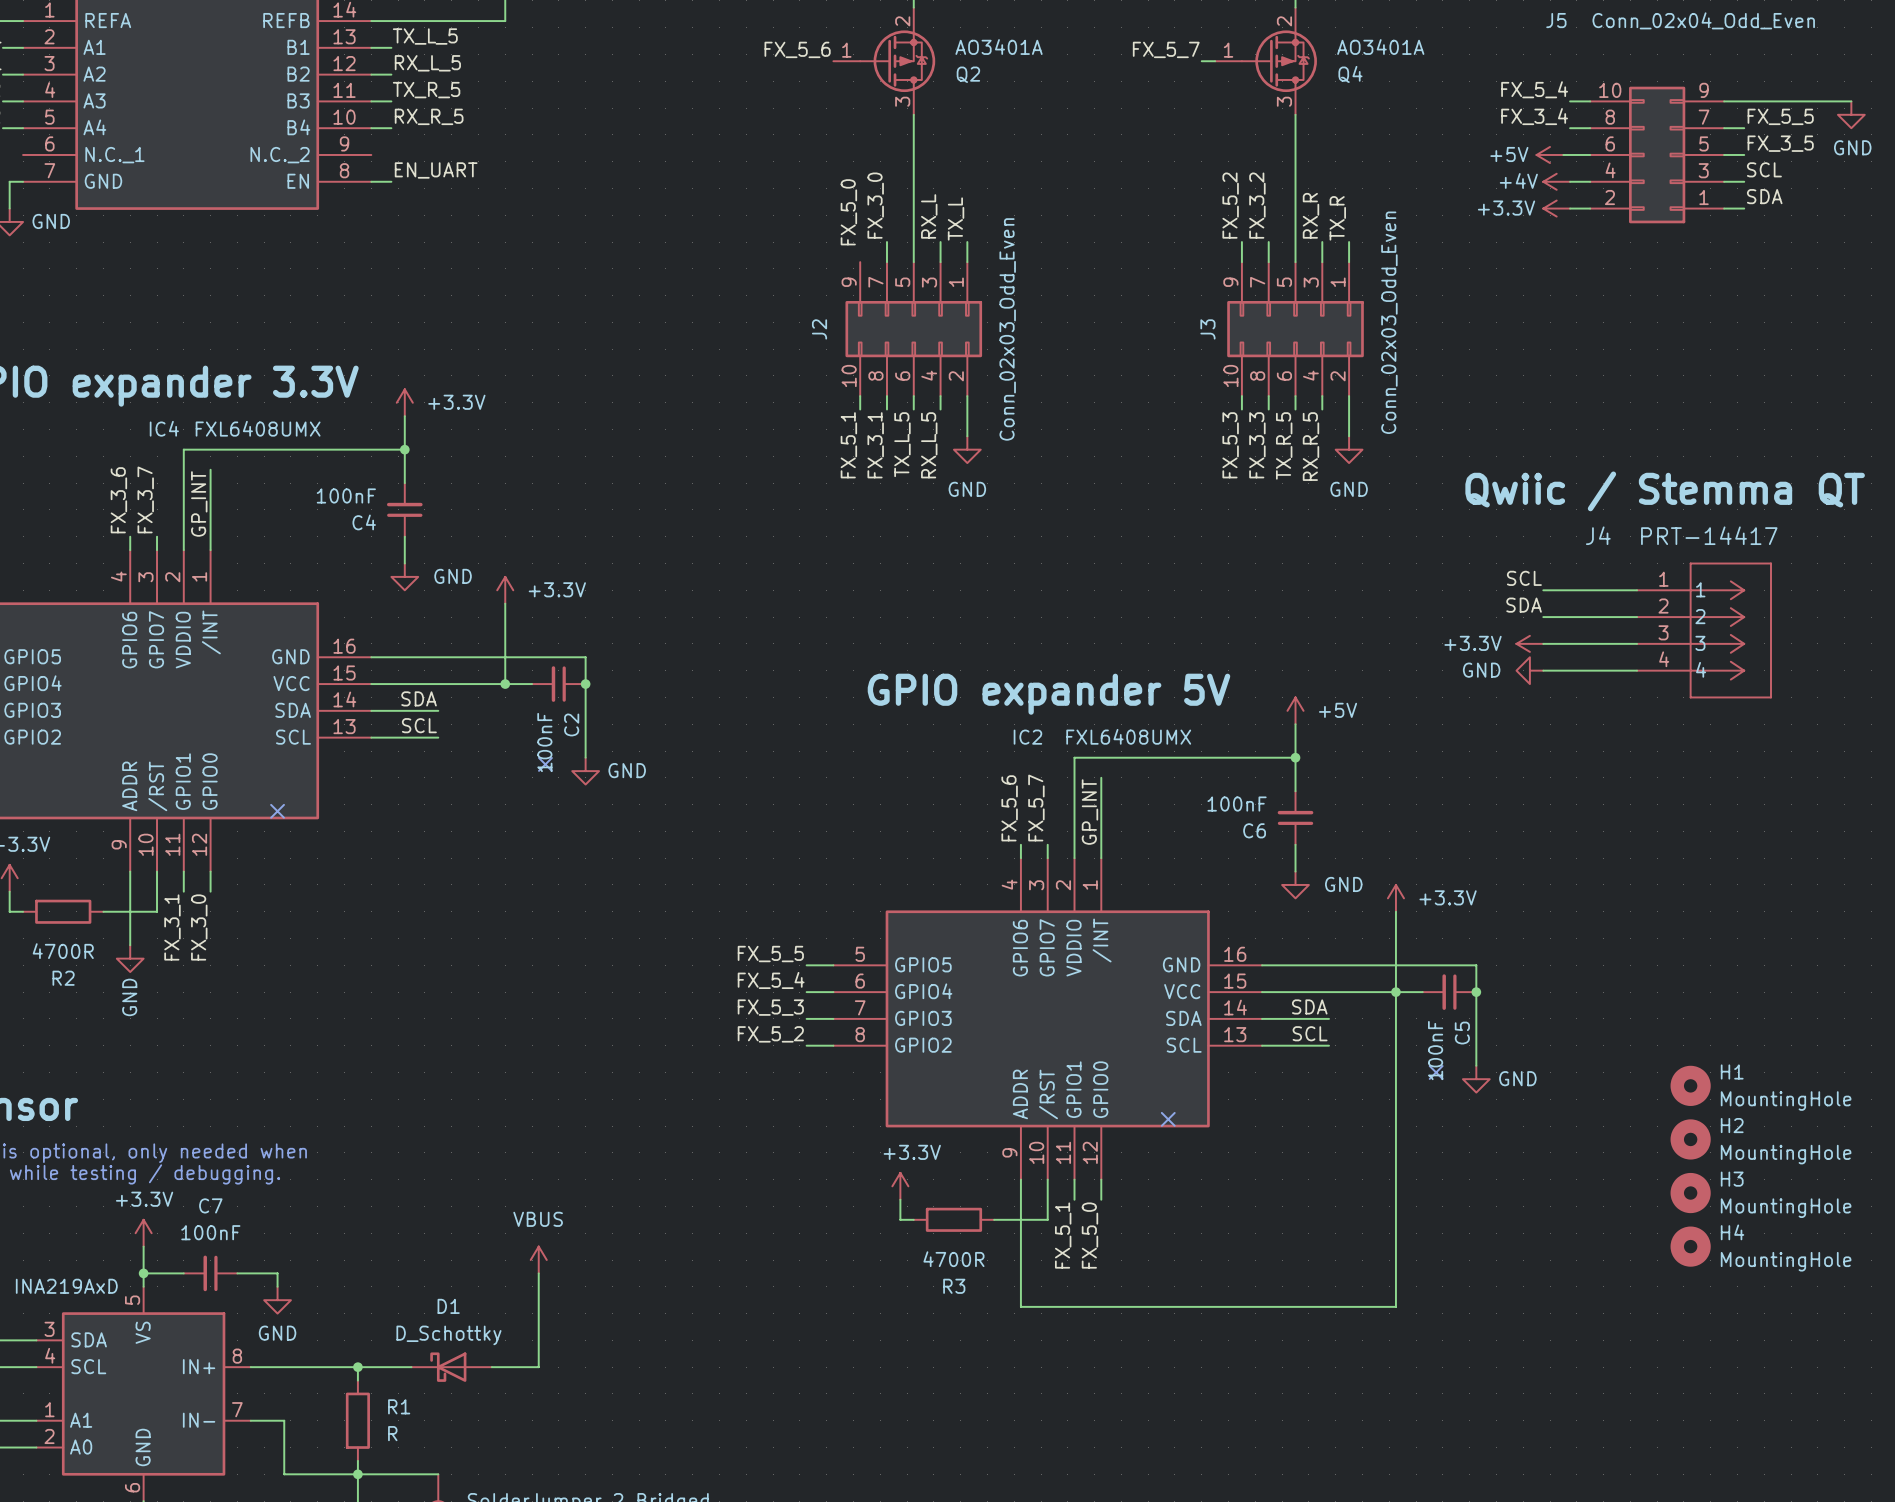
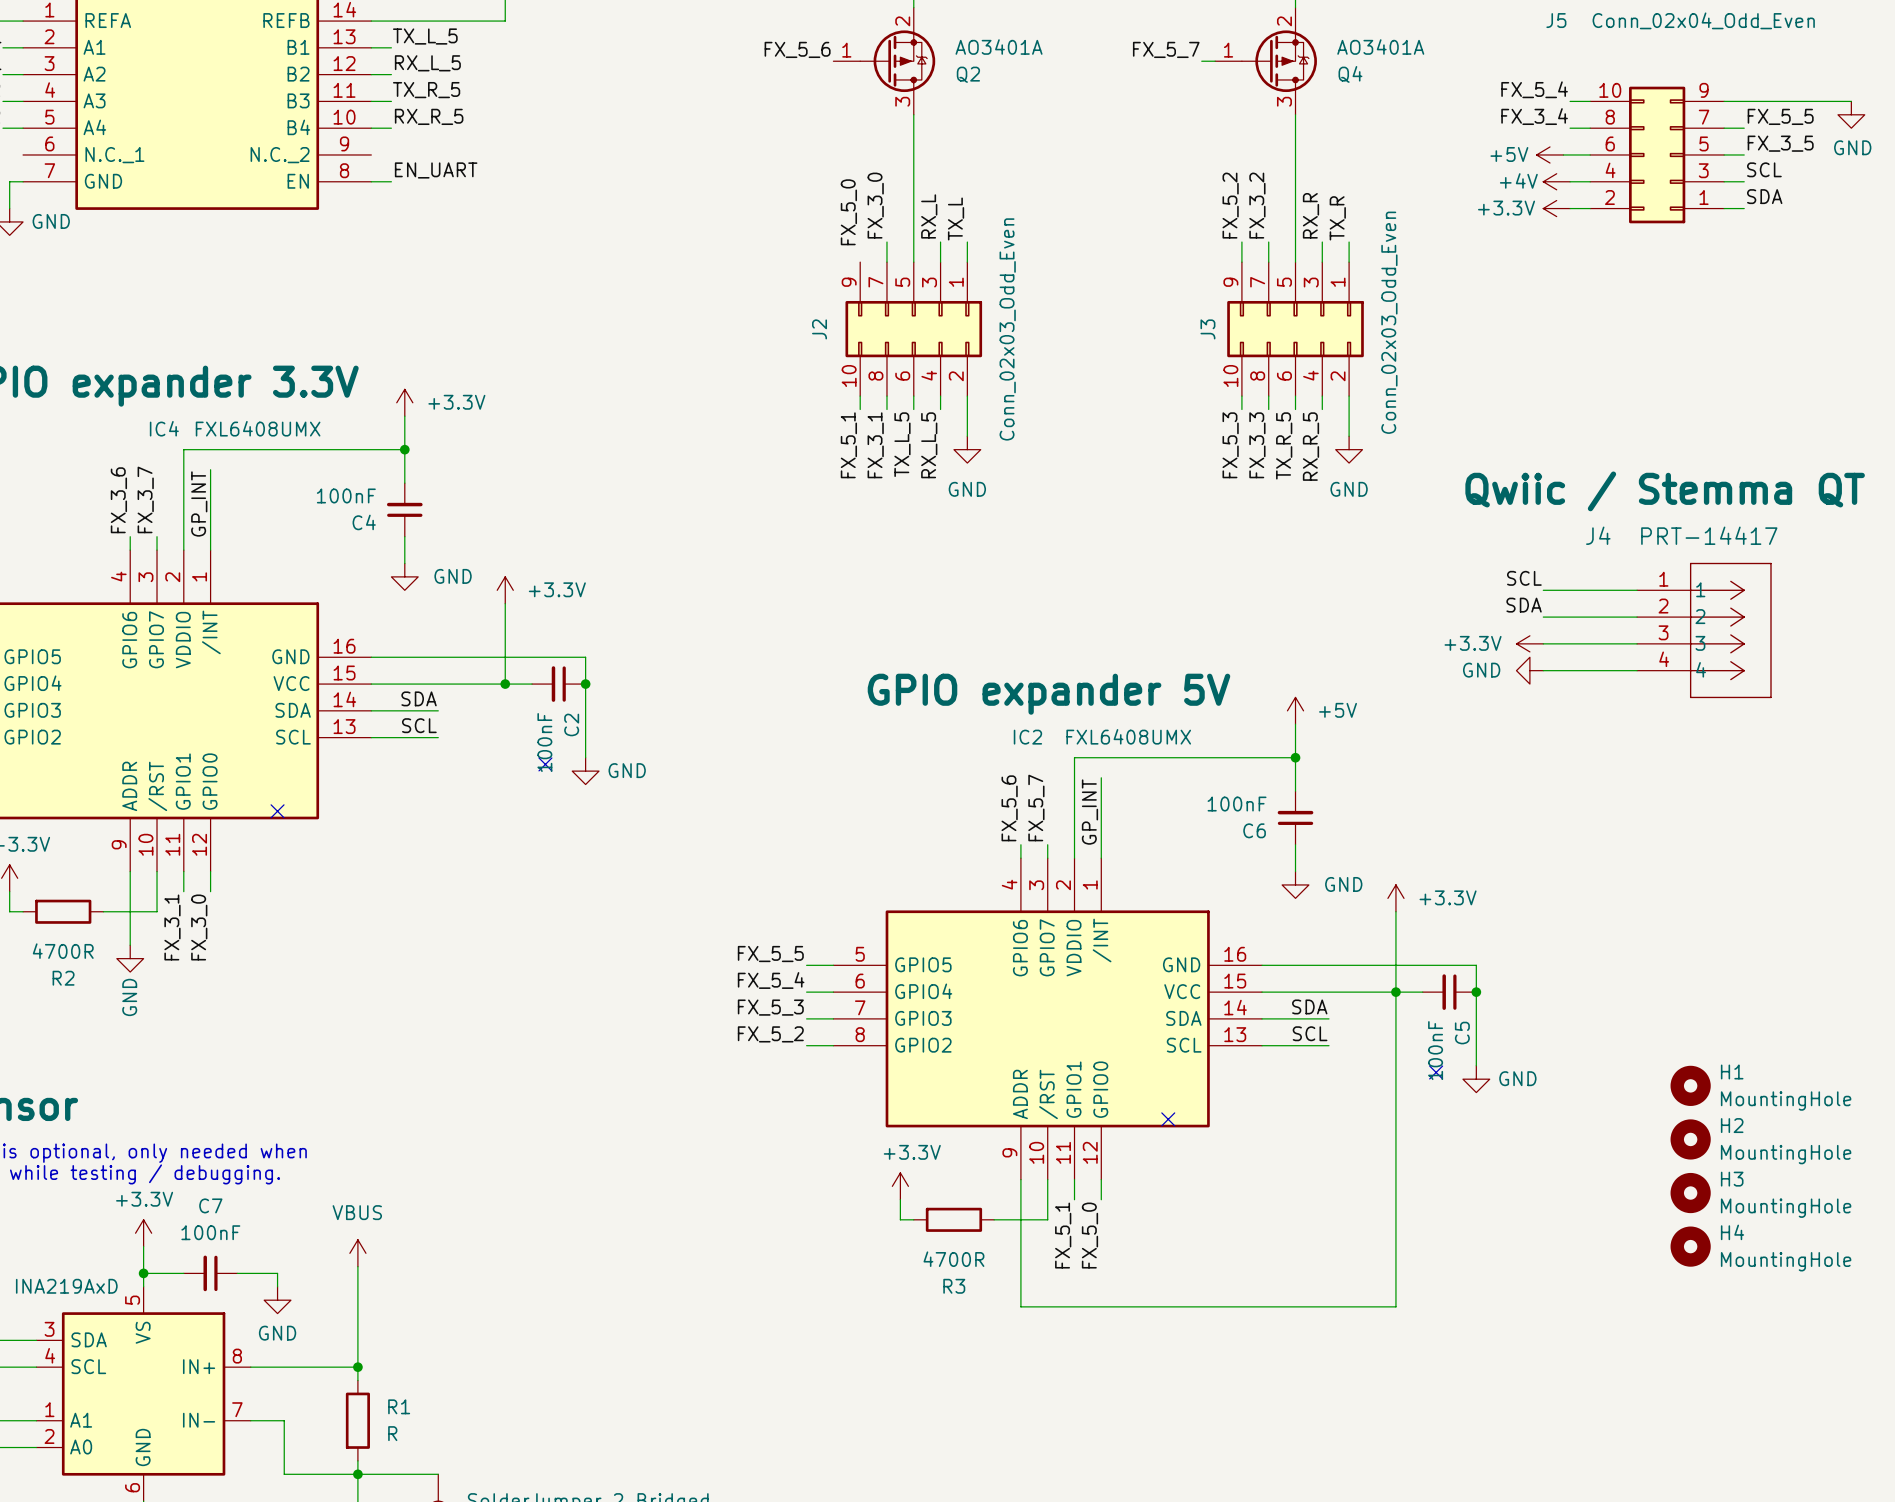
power symbol position: VBUS (538, 1260) -> VBUS (357, 1253)
wire: (538, 1273) (538, 1367) (491, 1367) -> none
wire: (357, 1367) (411, 1367) -> (357, 1367) (357, 1266)
D1: D_Schottky (451, 1367) -> none

